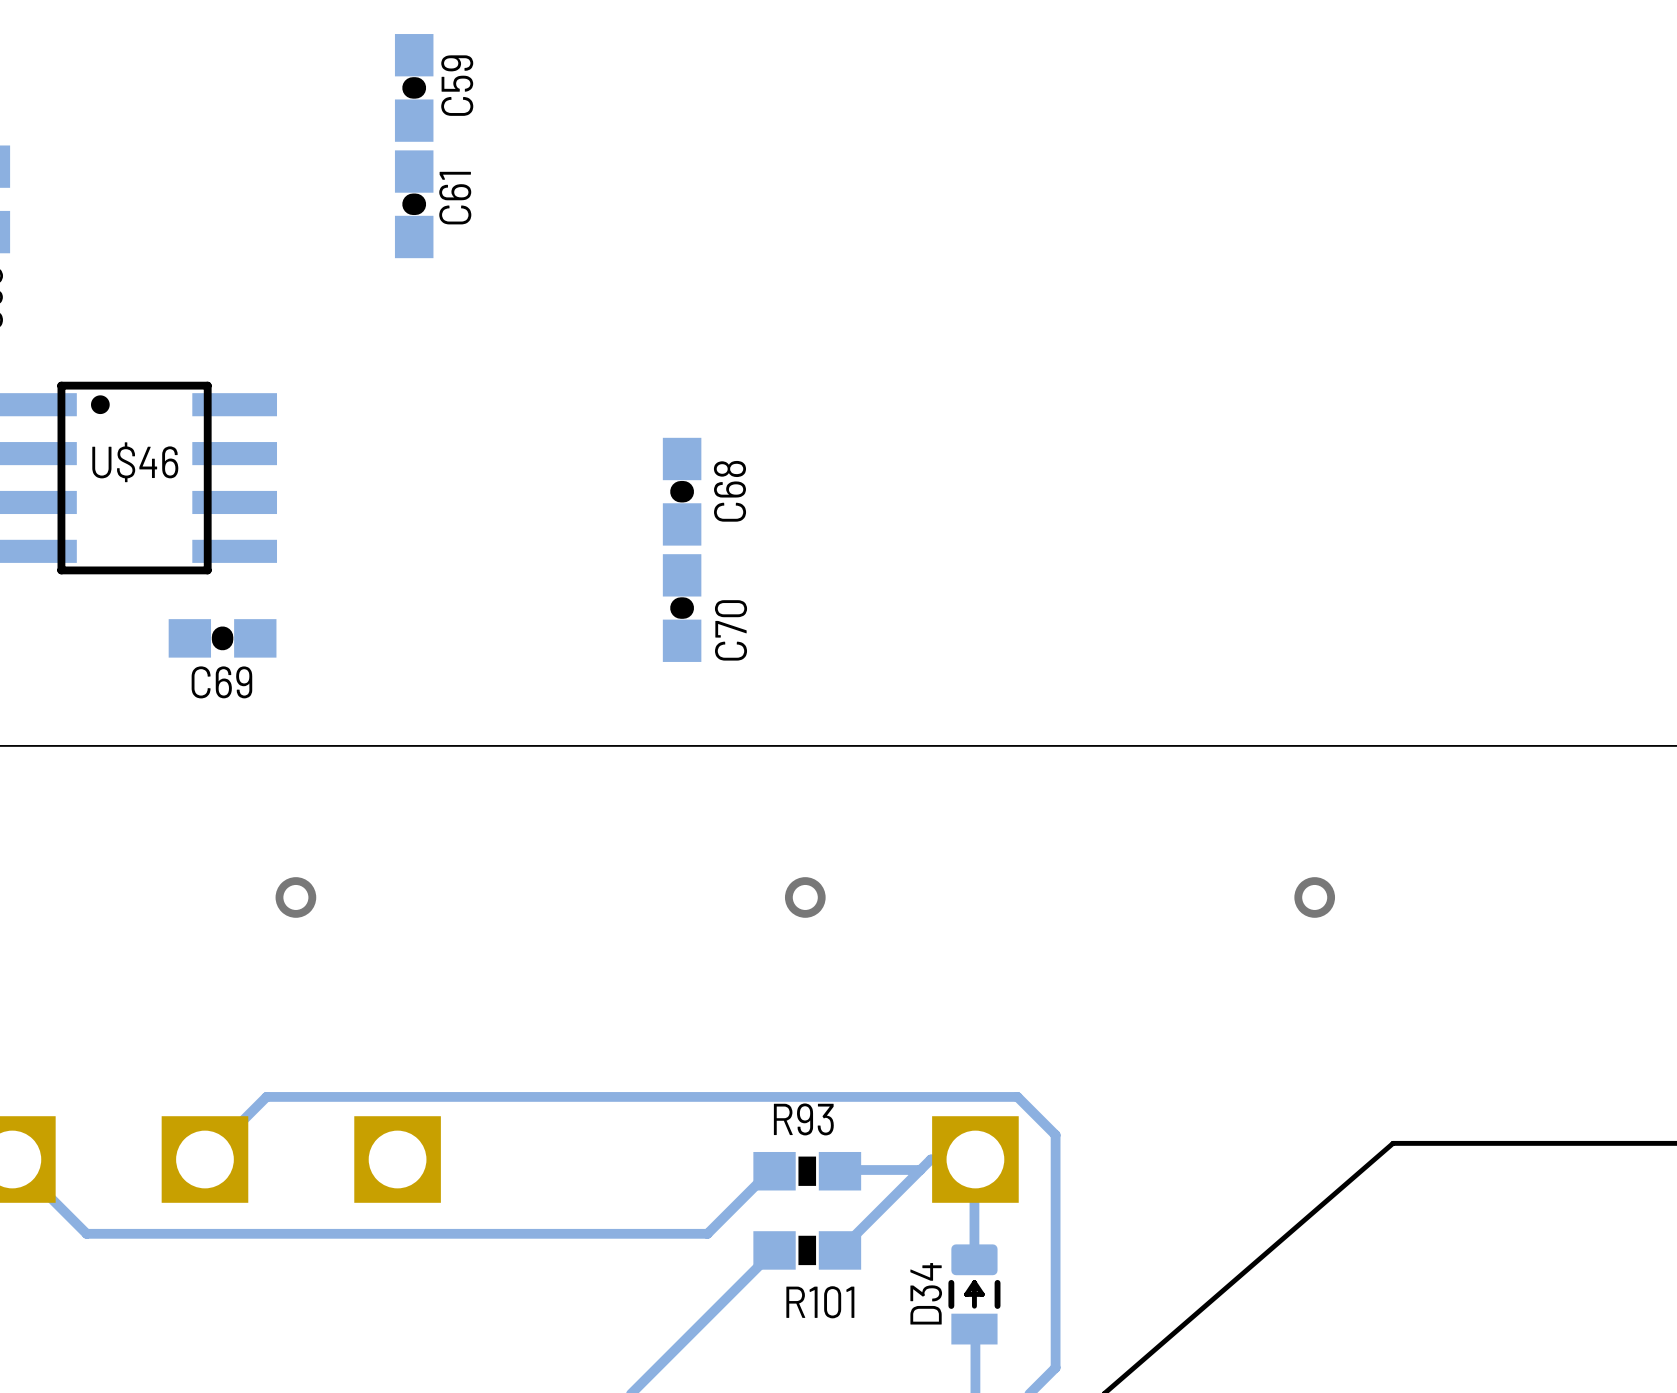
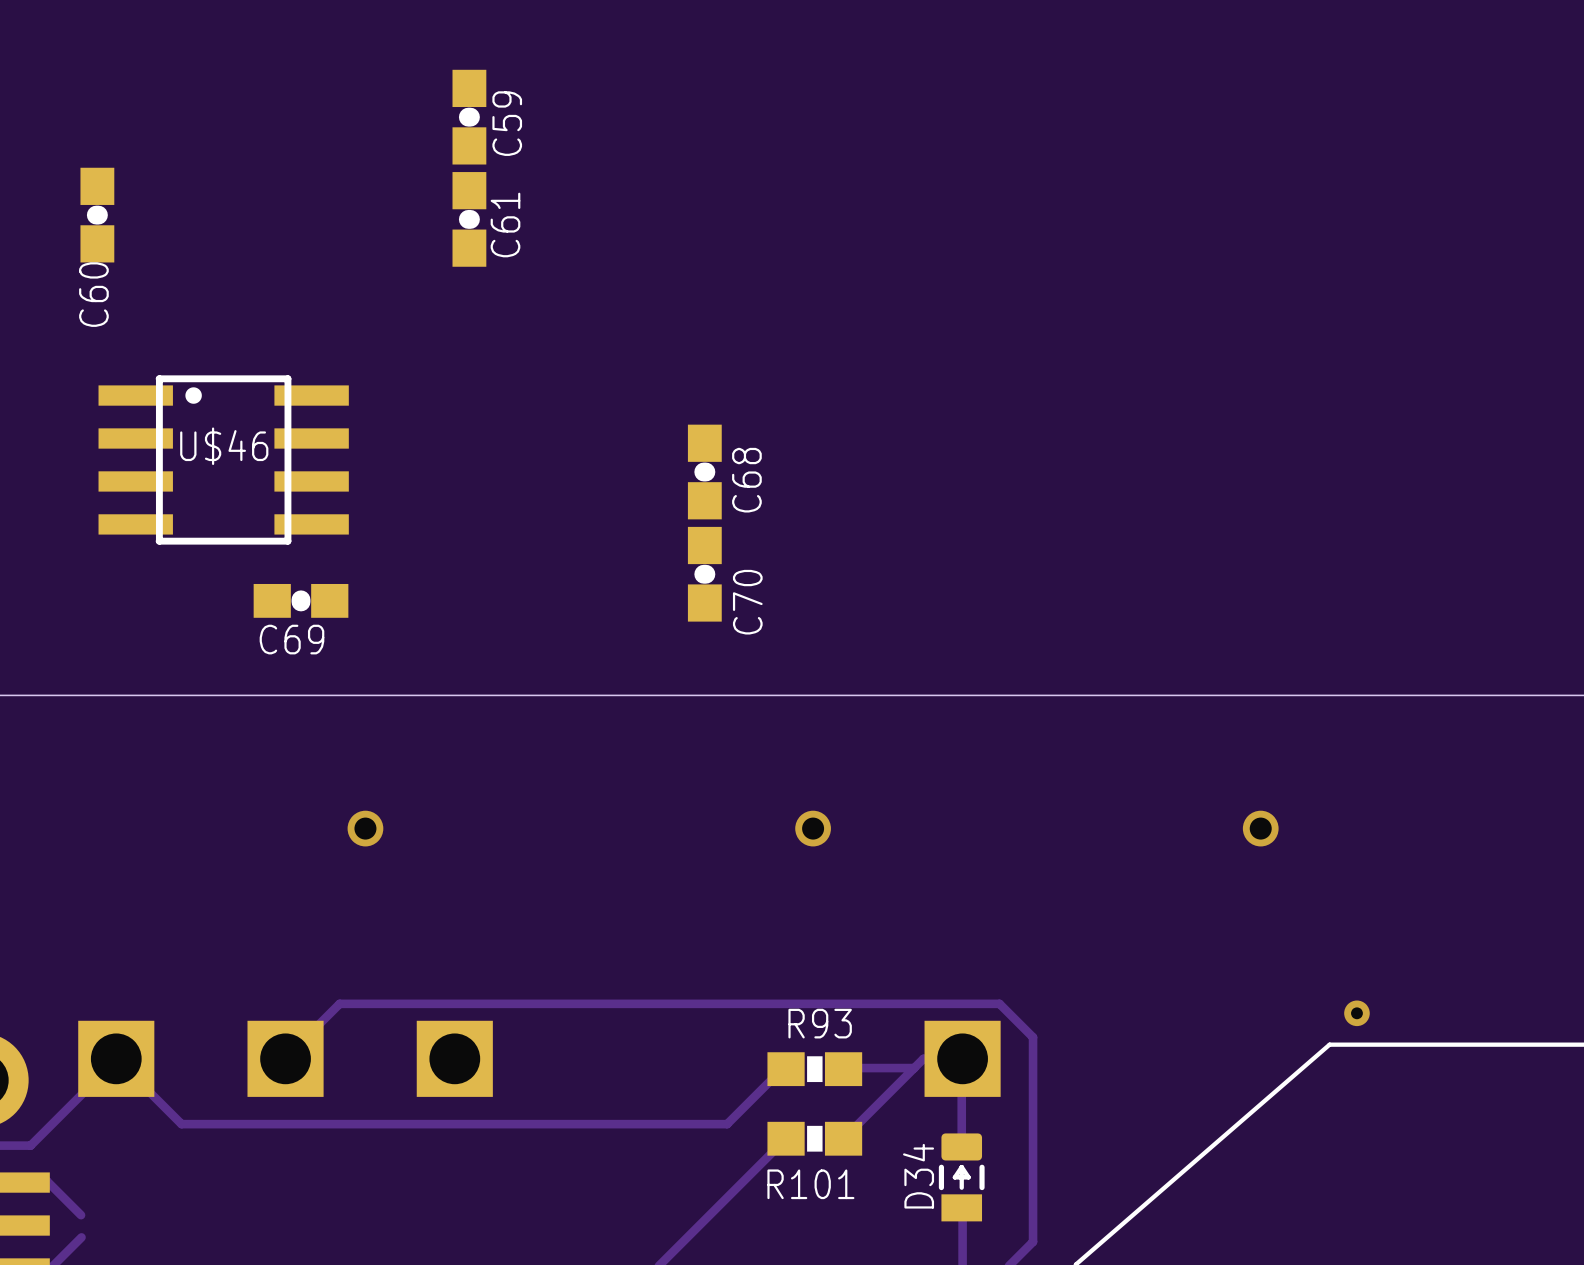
via: none -> (1356, 1013)

